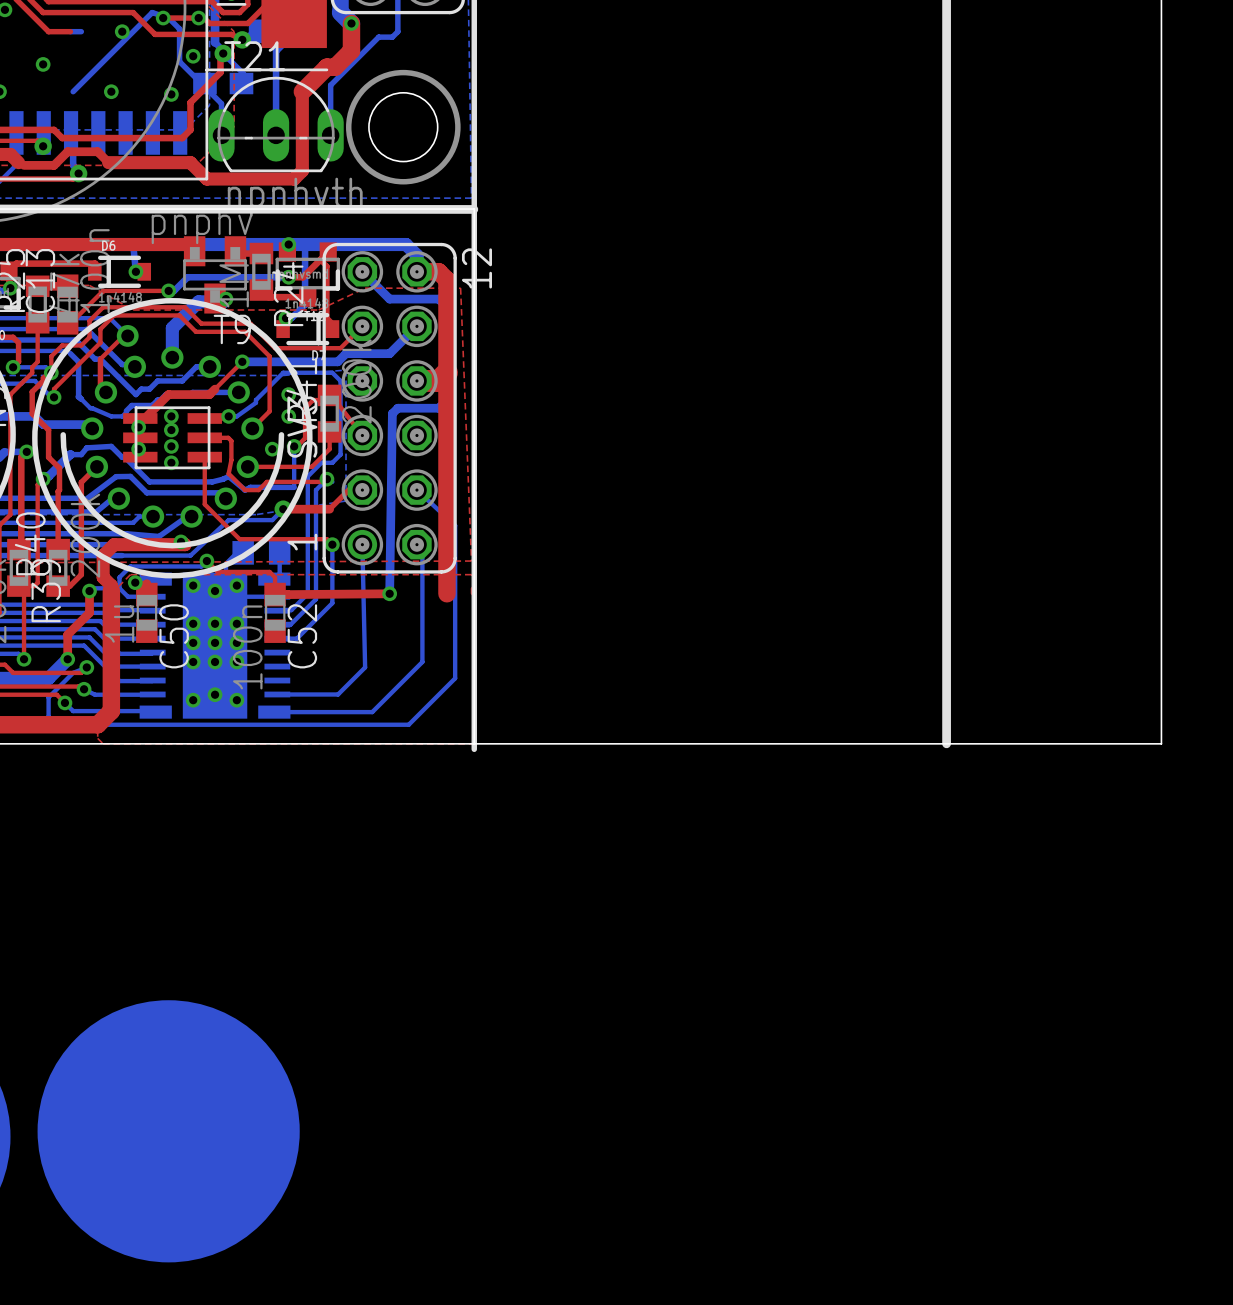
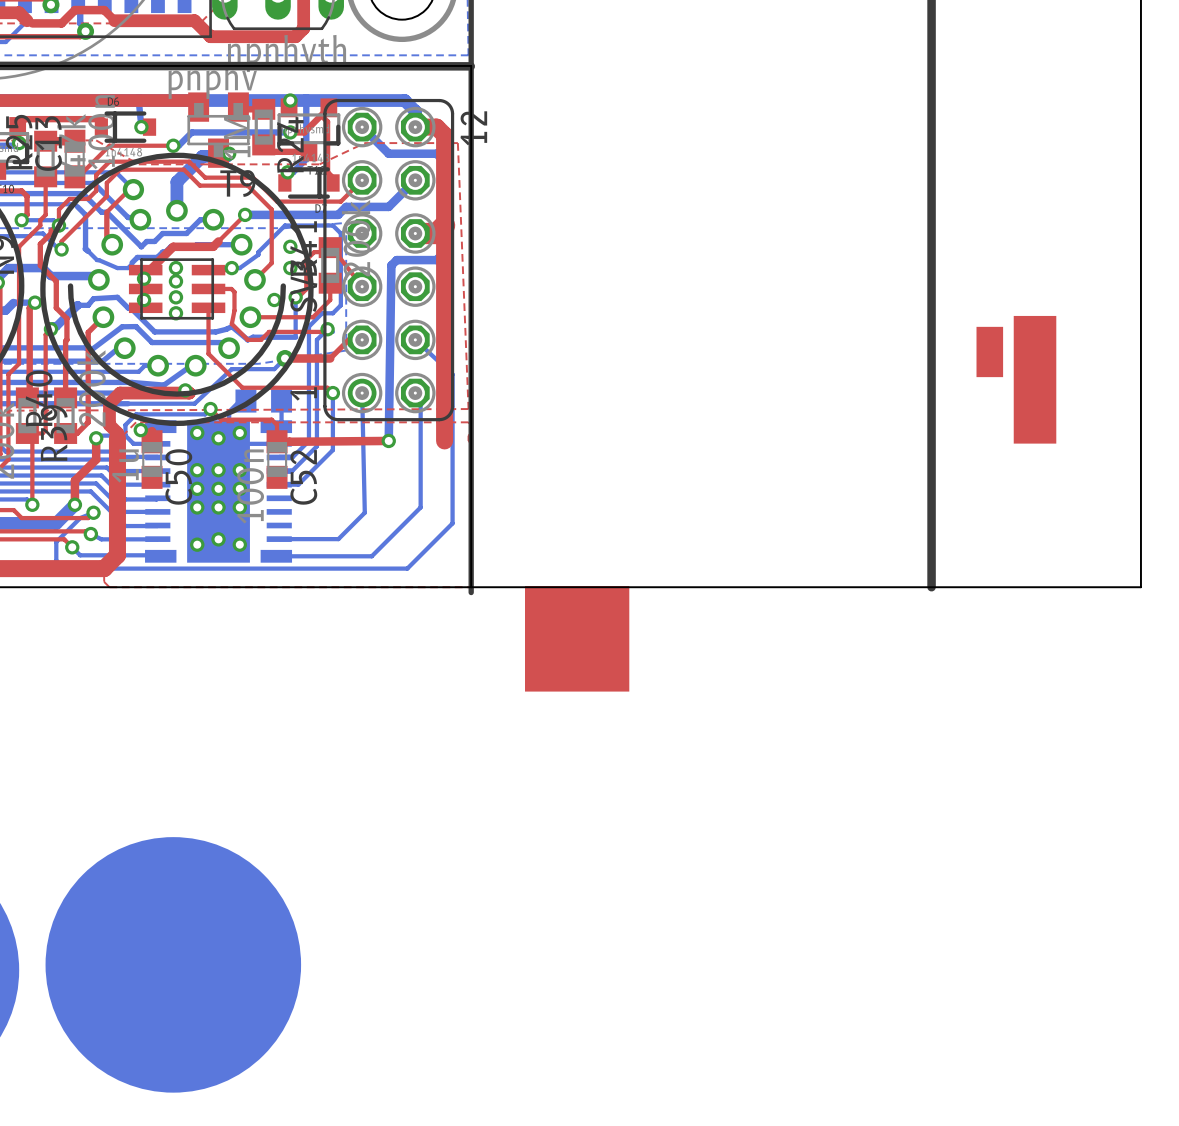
drawing: none -> [976, 315, 1057, 444]
drawing: none -> [525, 586, 630, 692]

